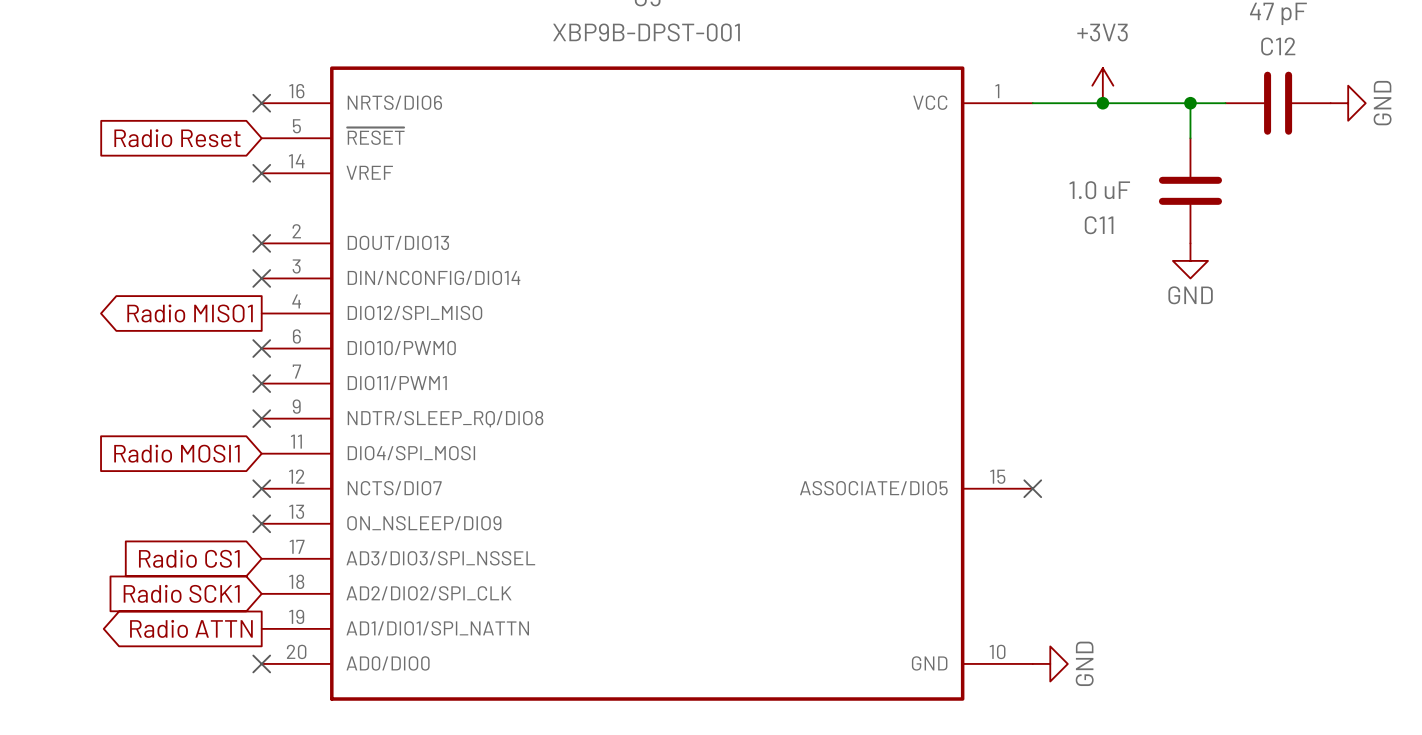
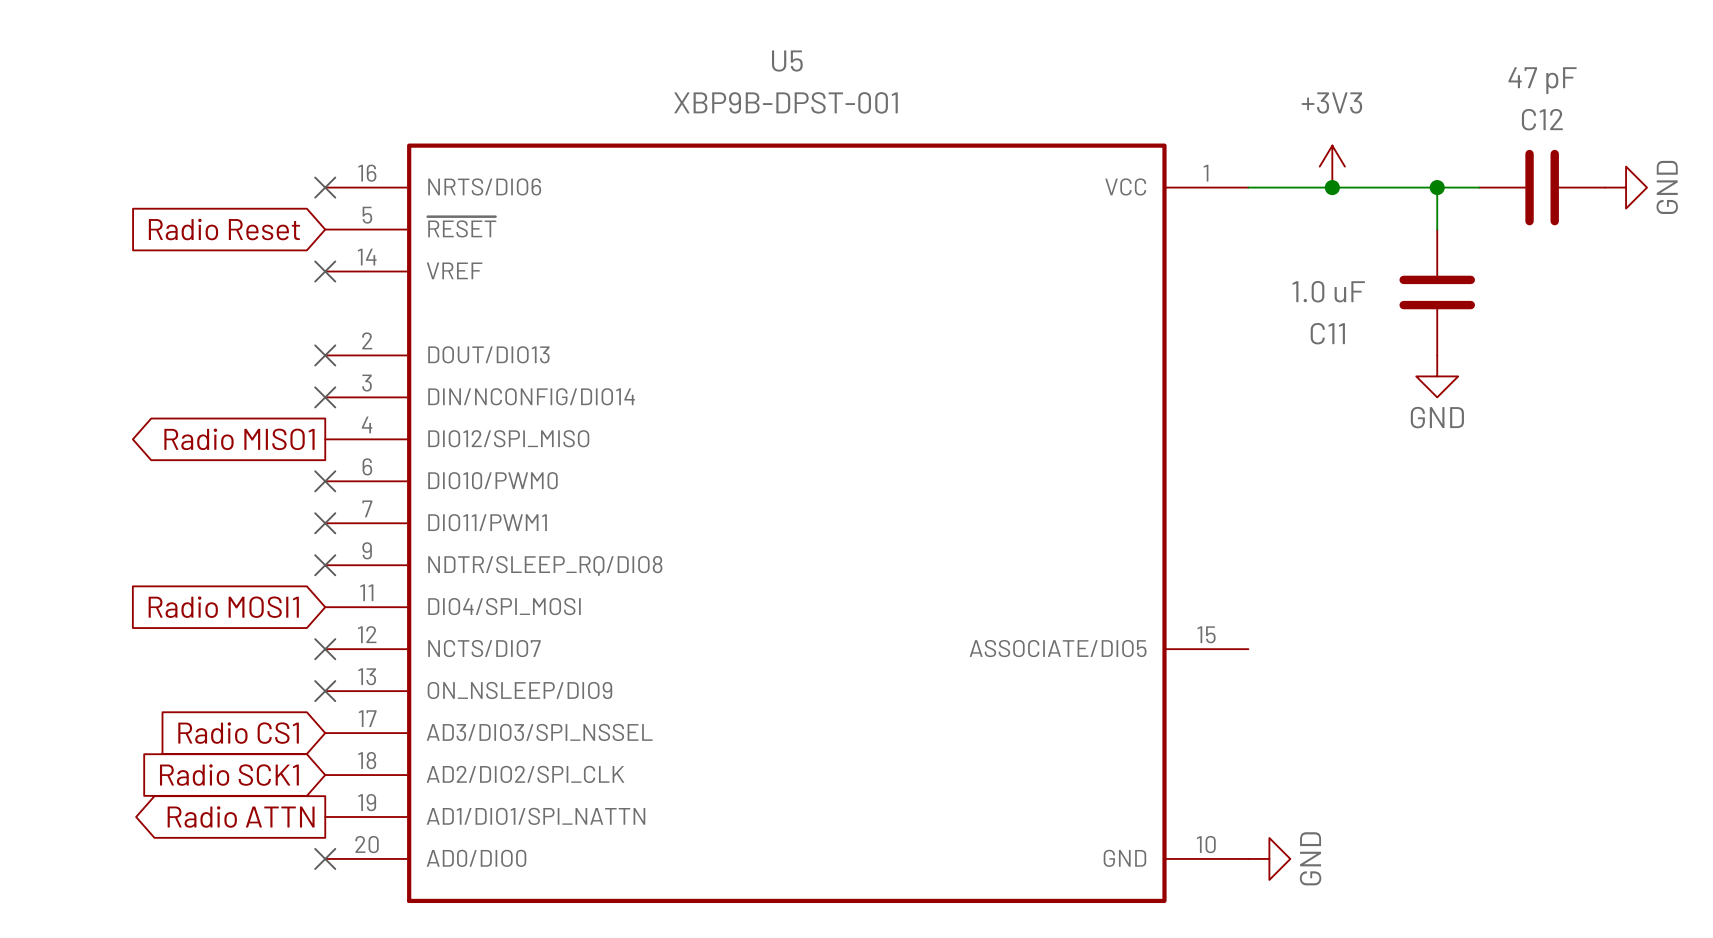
no-connect mark: (1032, 488) -> none

